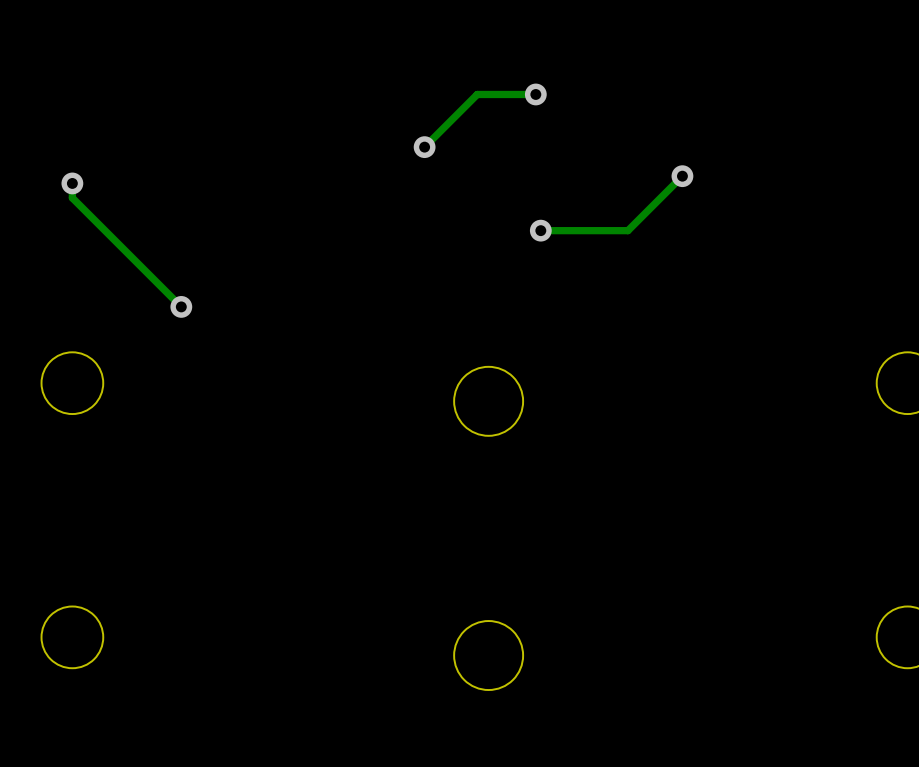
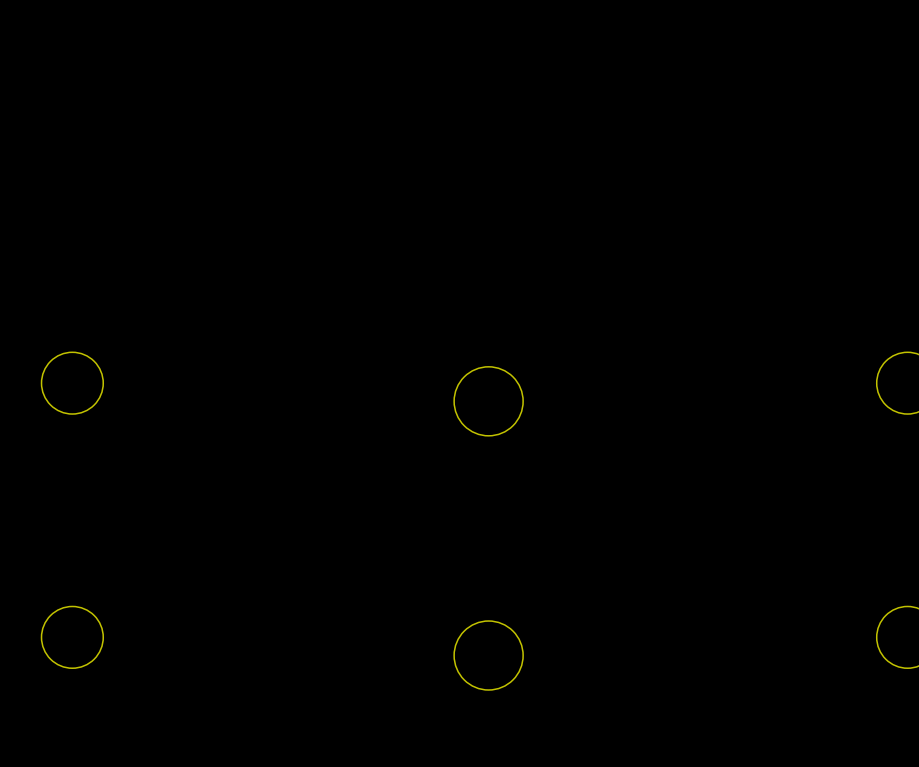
track: (535, 94) (477, 94) (424, 147) -> none
via: (535, 94) -> none
via: (424, 147) -> none
track: (682, 176) (627, 230) (540, 230) -> none
via: (682, 176) -> none
track: (72, 183) (72, 197) (181, 306) -> none
via: (72, 183) -> none
via: (540, 230) -> none
via: (181, 306) -> none

